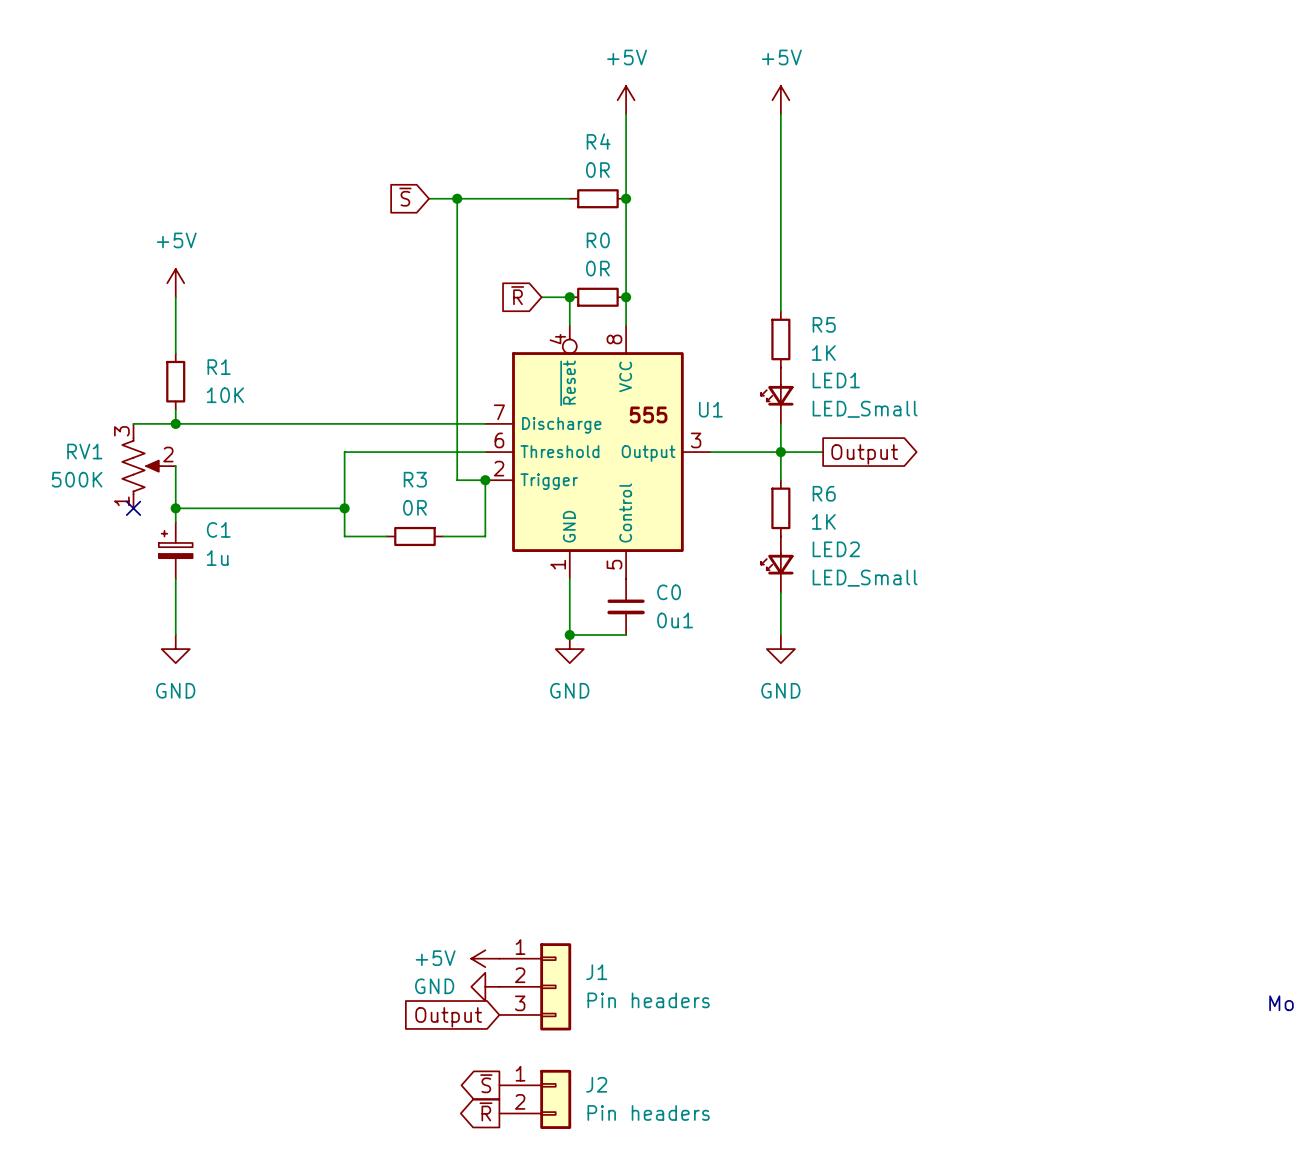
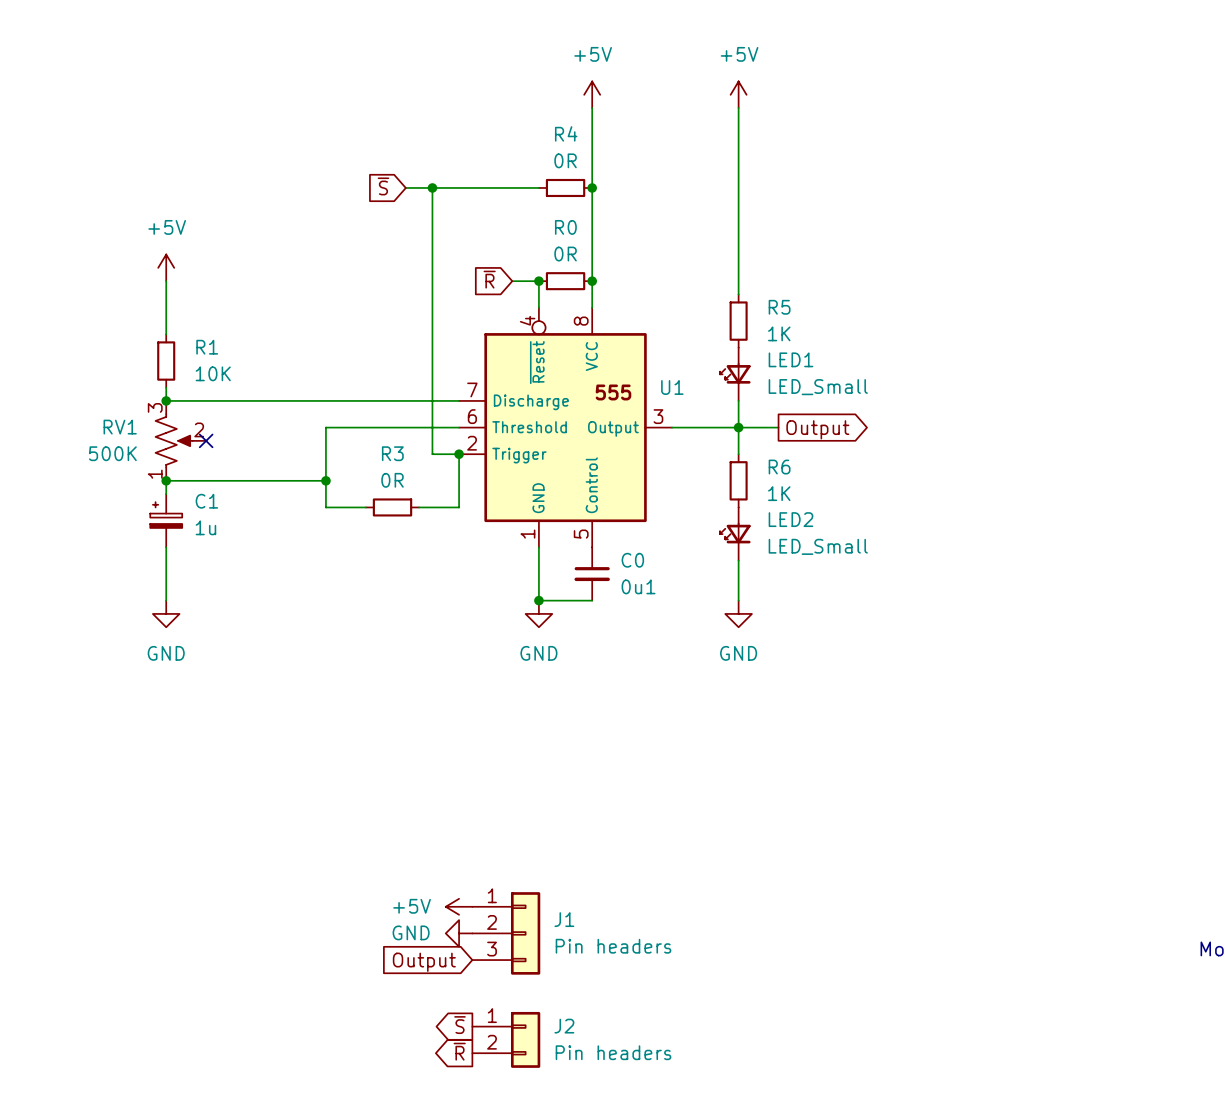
wire: (133, 423) (175, 423) -> none
RV1 position: (148, 466) -> (180, 440)
no-connect mark: none -> (206, 440)
no-connect mark: (133, 508) -> none

